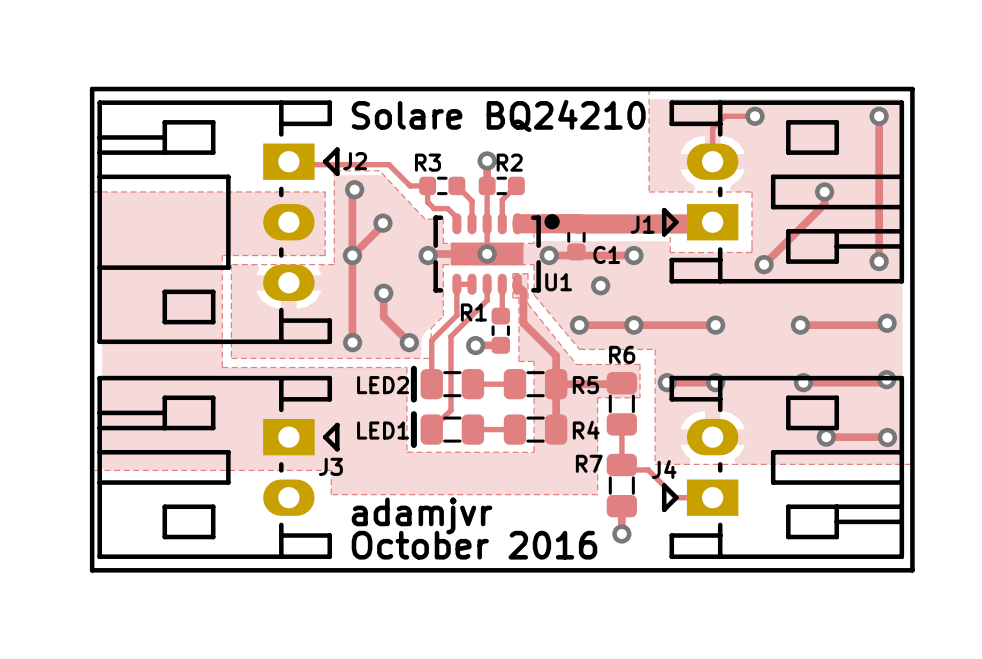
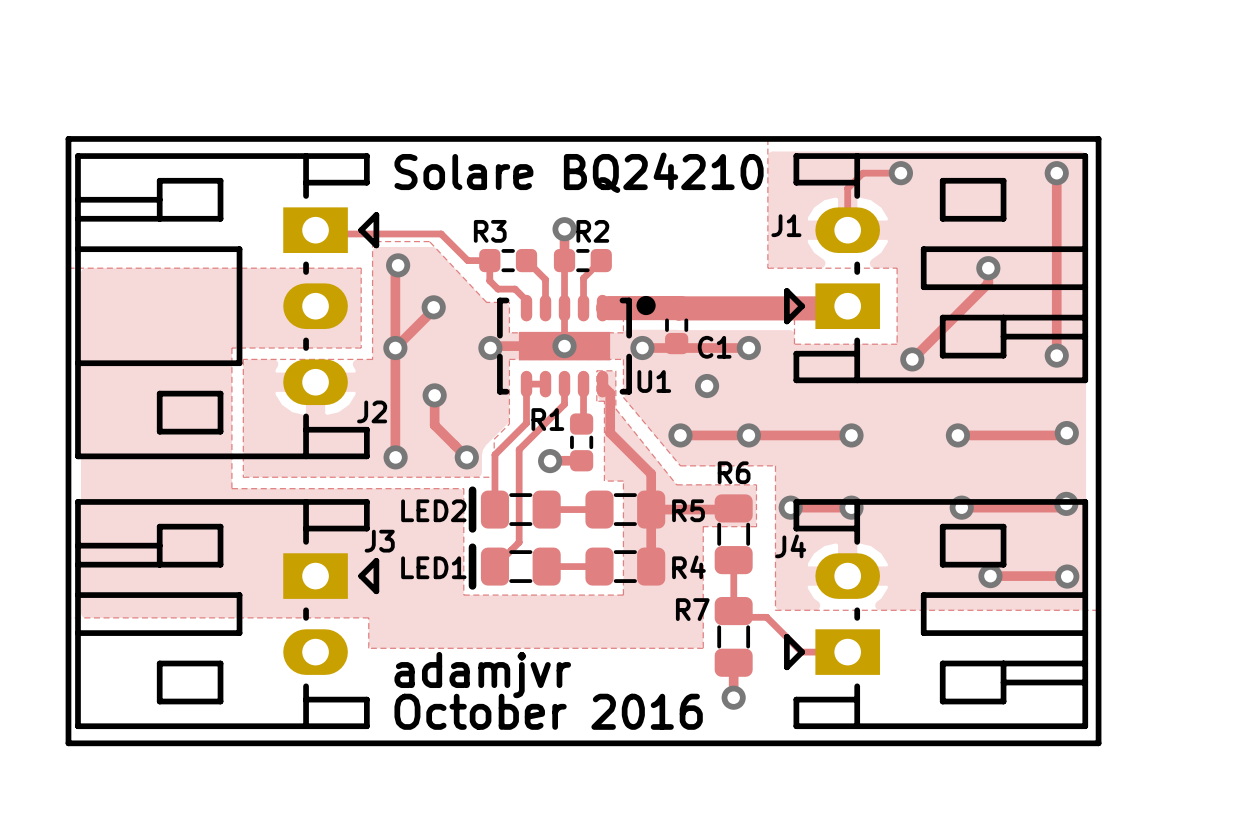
J2 name position: J2 (355, 161) -> J2 (372, 411)
J1 name position: J1 (642, 224) -> J1 (786, 225)
J3 name position: J3 (330, 466) -> J3 (379, 541)
J4 name position: J4 (664, 469) -> J4 (790, 546)

